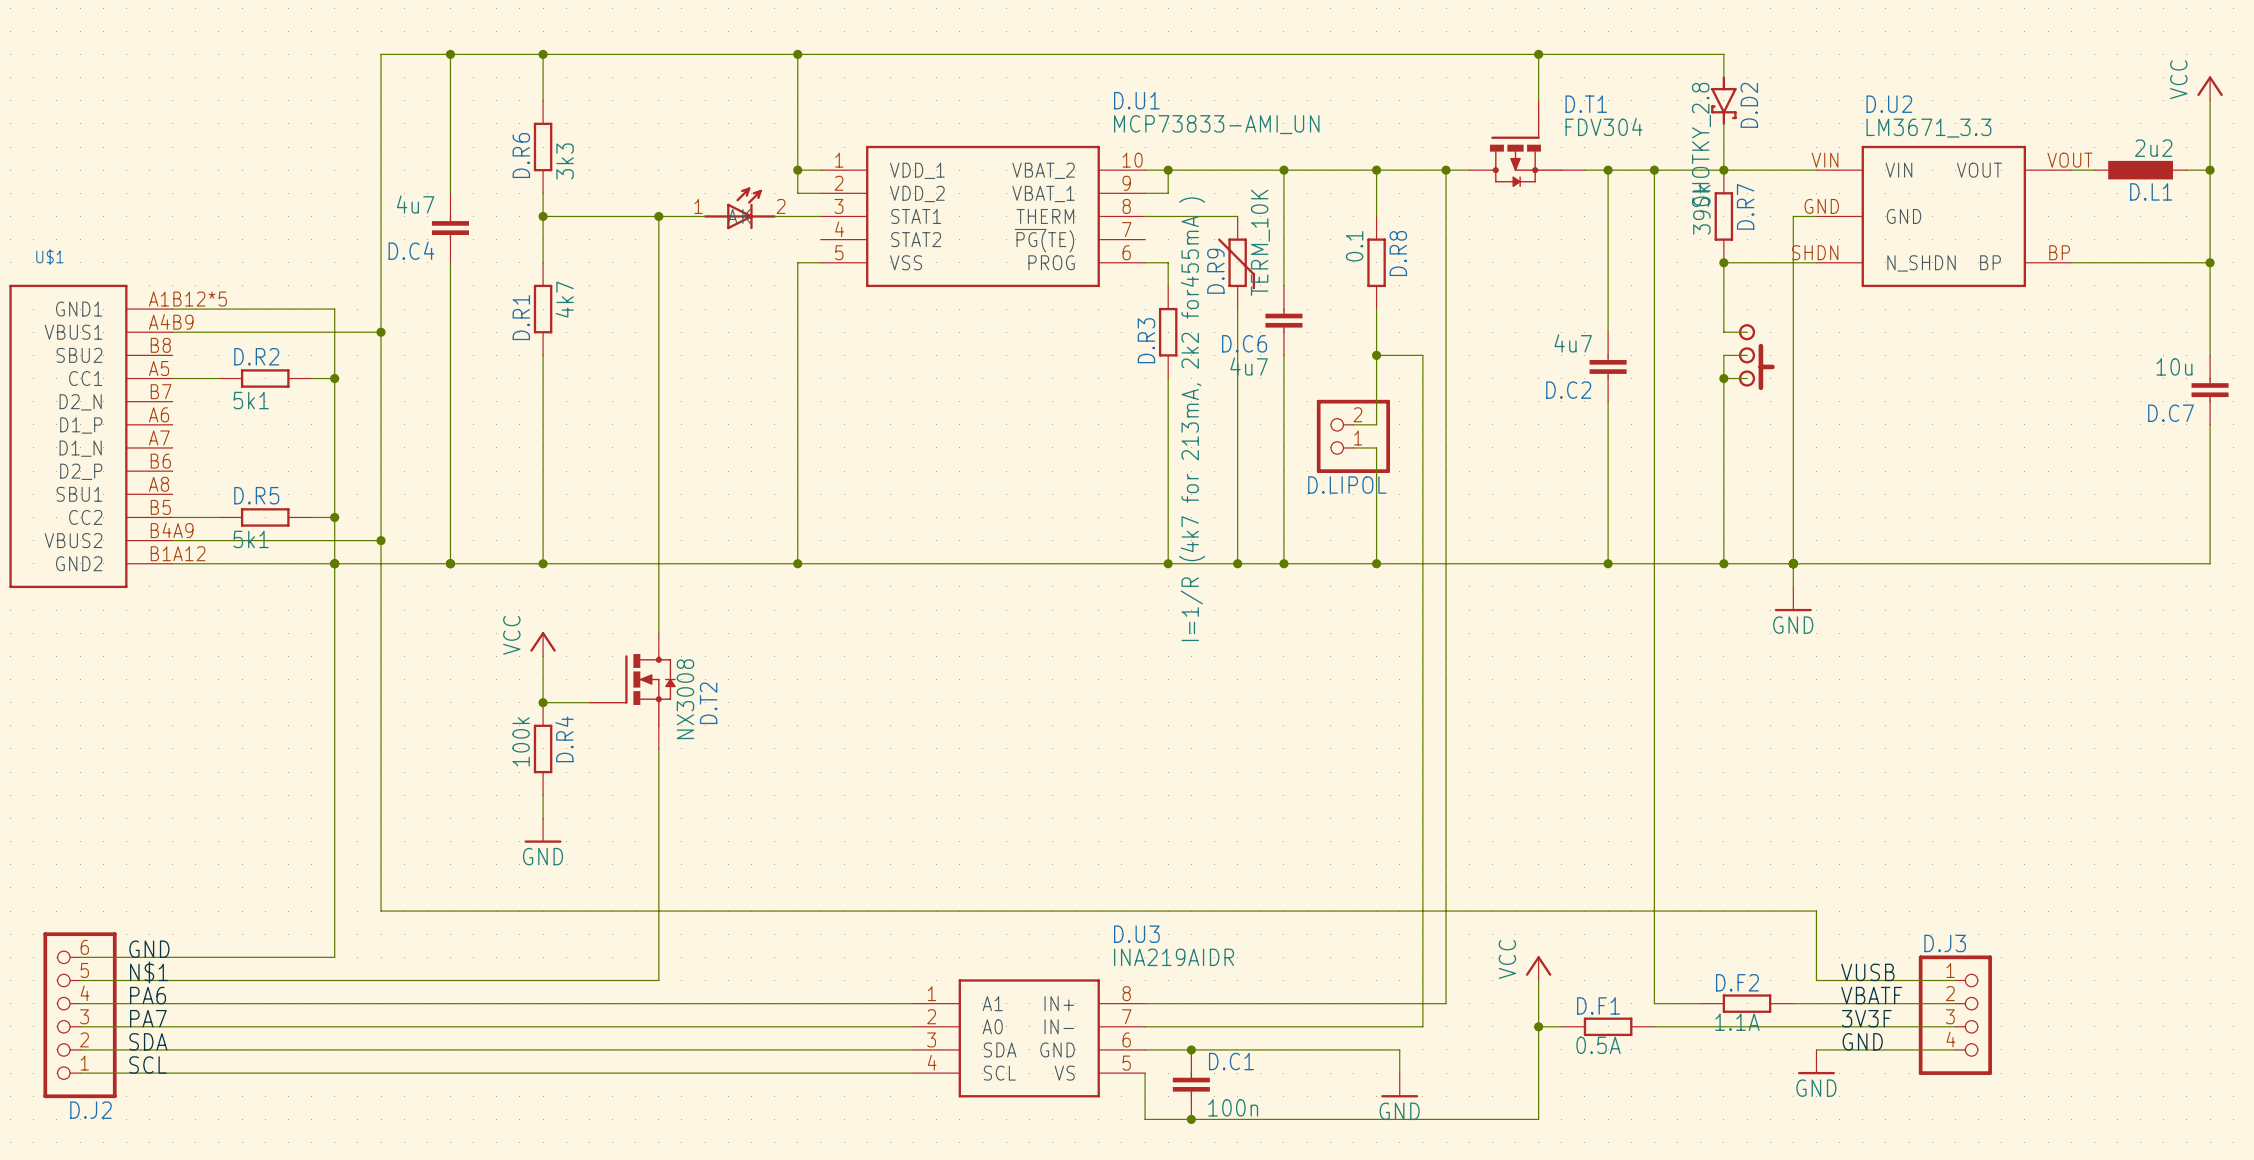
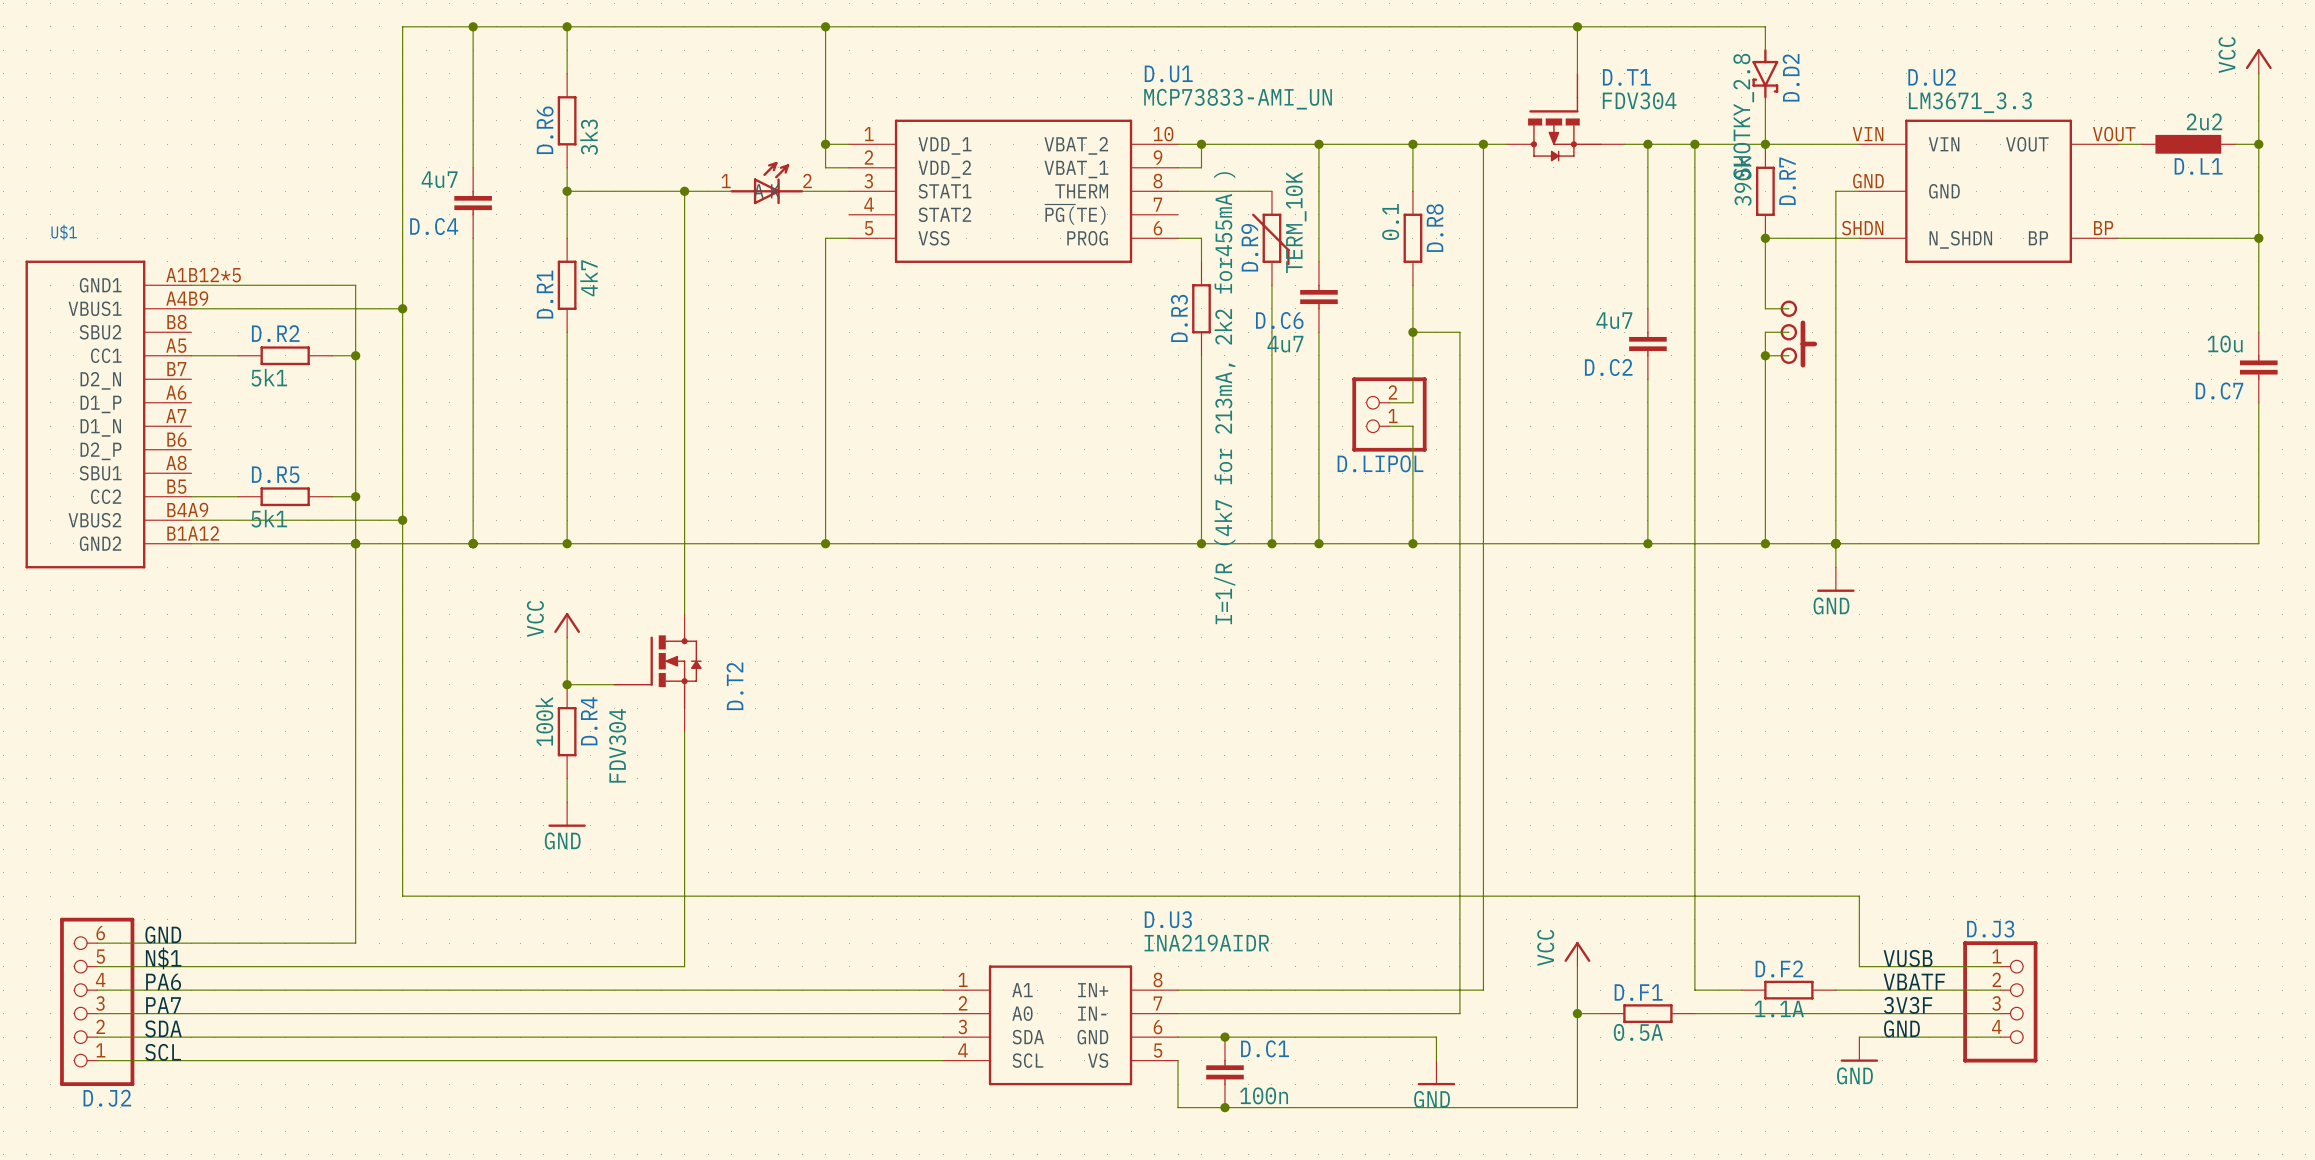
D.T2 value: NX3008 (685, 699) -> FDV304 (617, 745)

